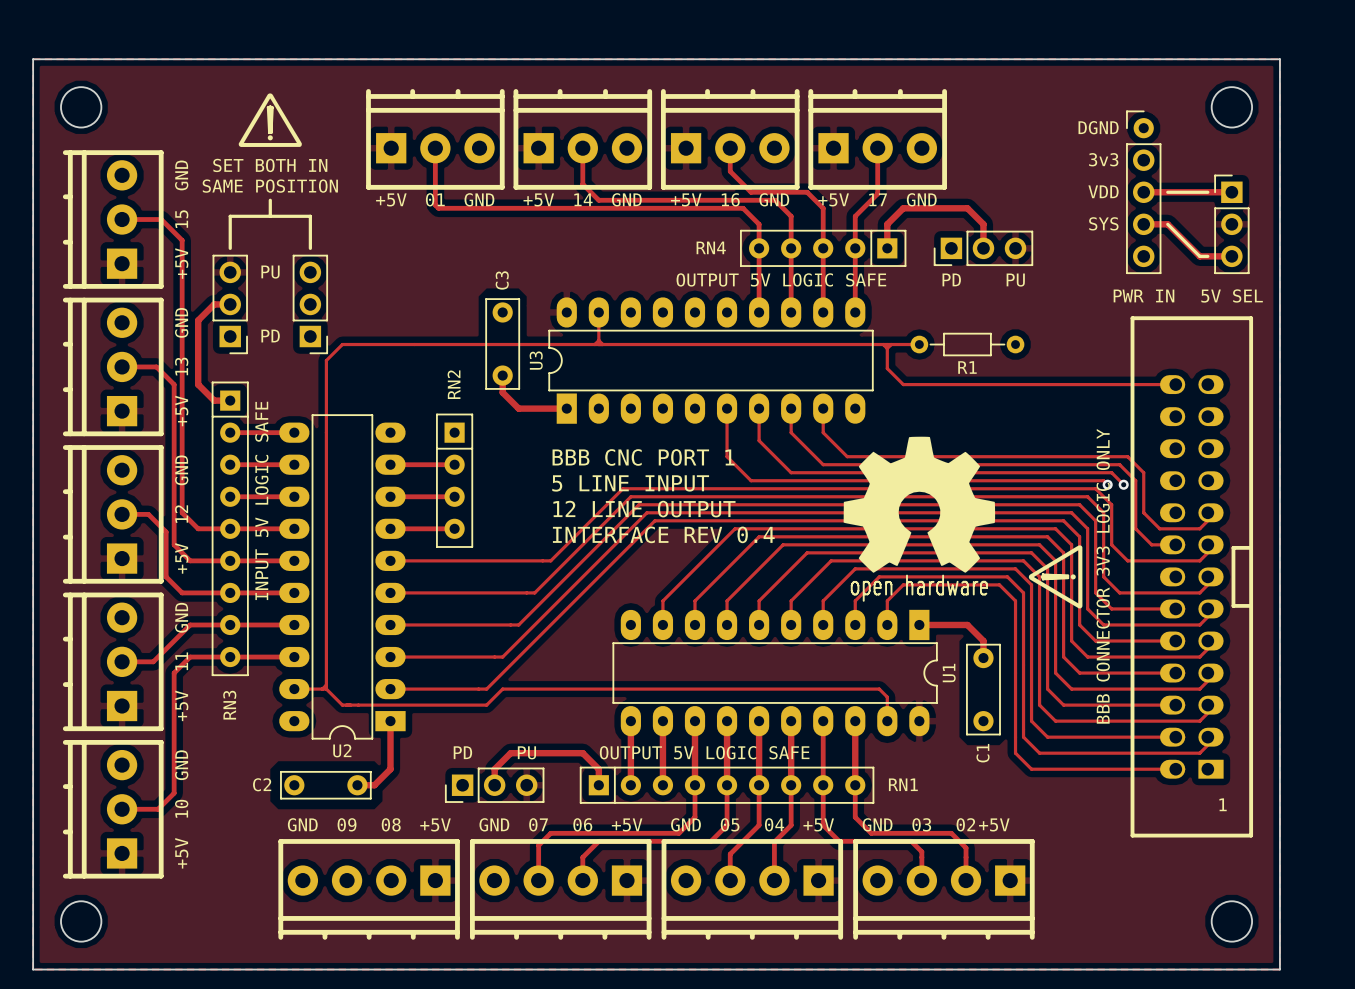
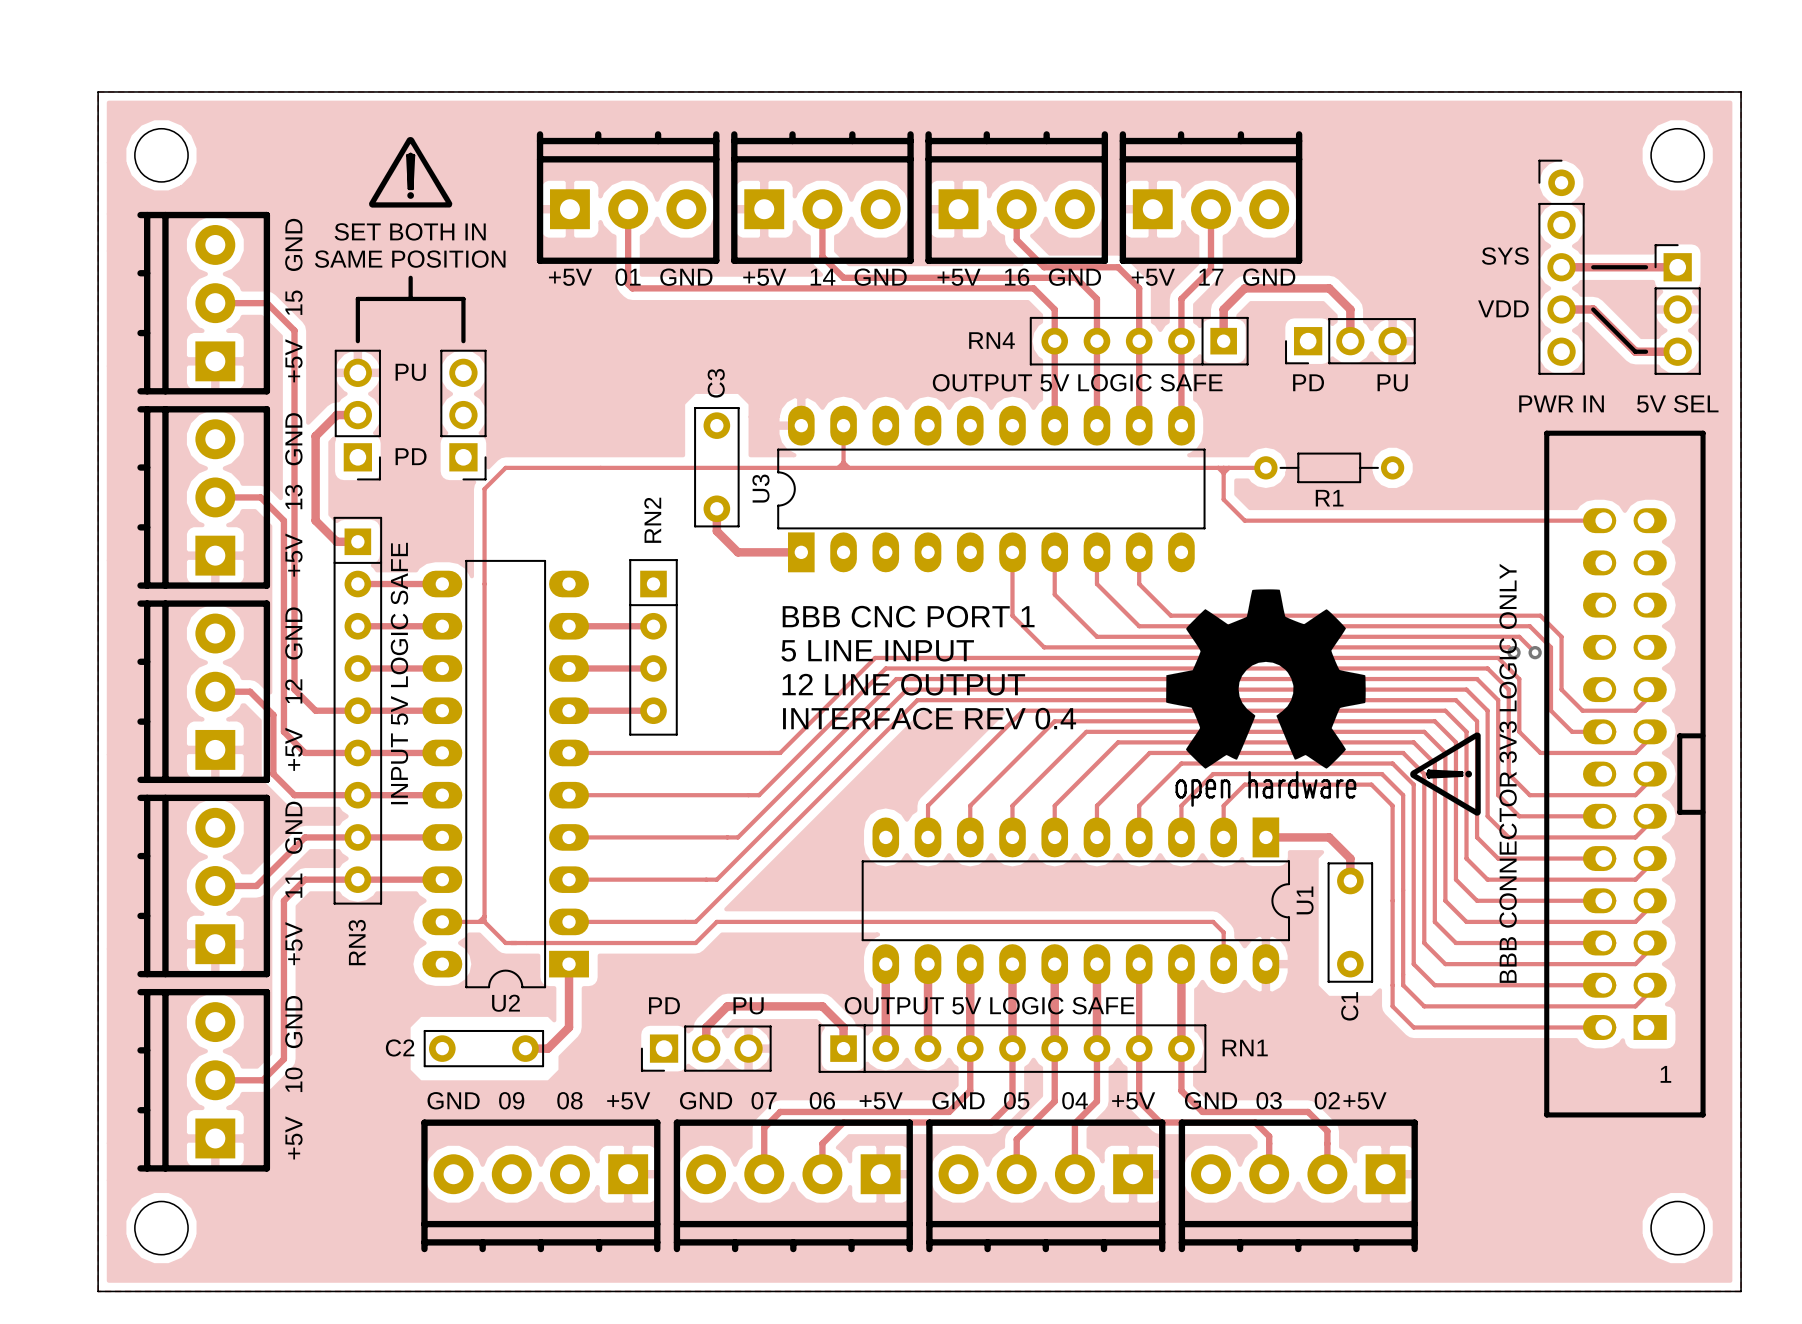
text: DGND (1098, 127) -> none
text: 3v3 (1103, 159) -> none
text: VDD (1103, 191) -> SYS (1505, 256)
text: SYS (1103, 223) -> VDD (1503, 308)

